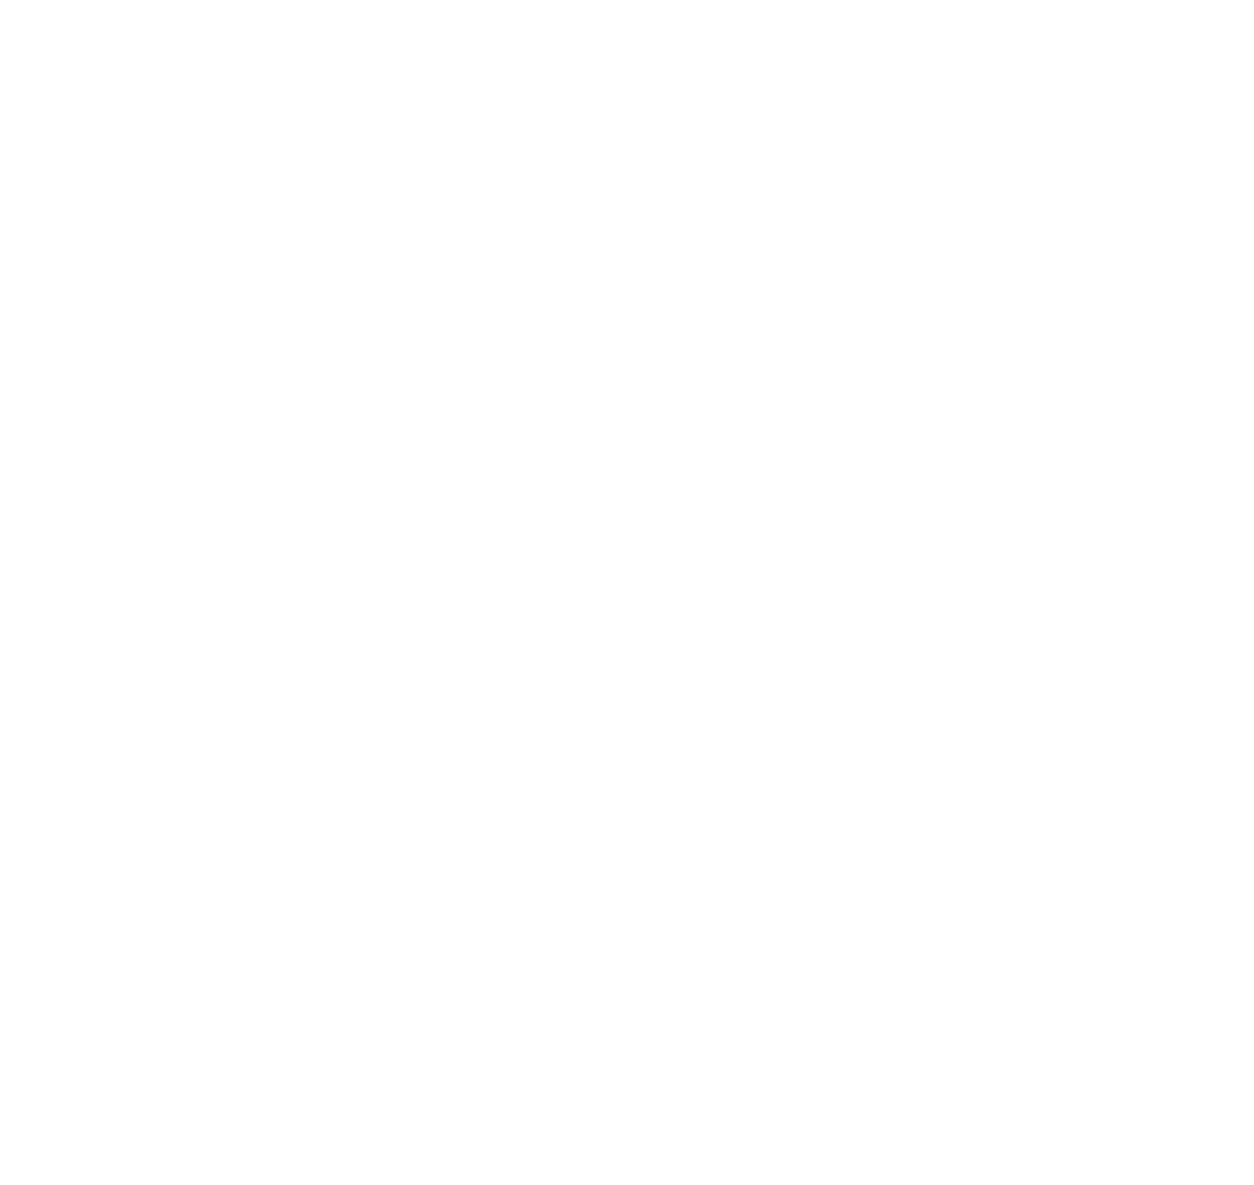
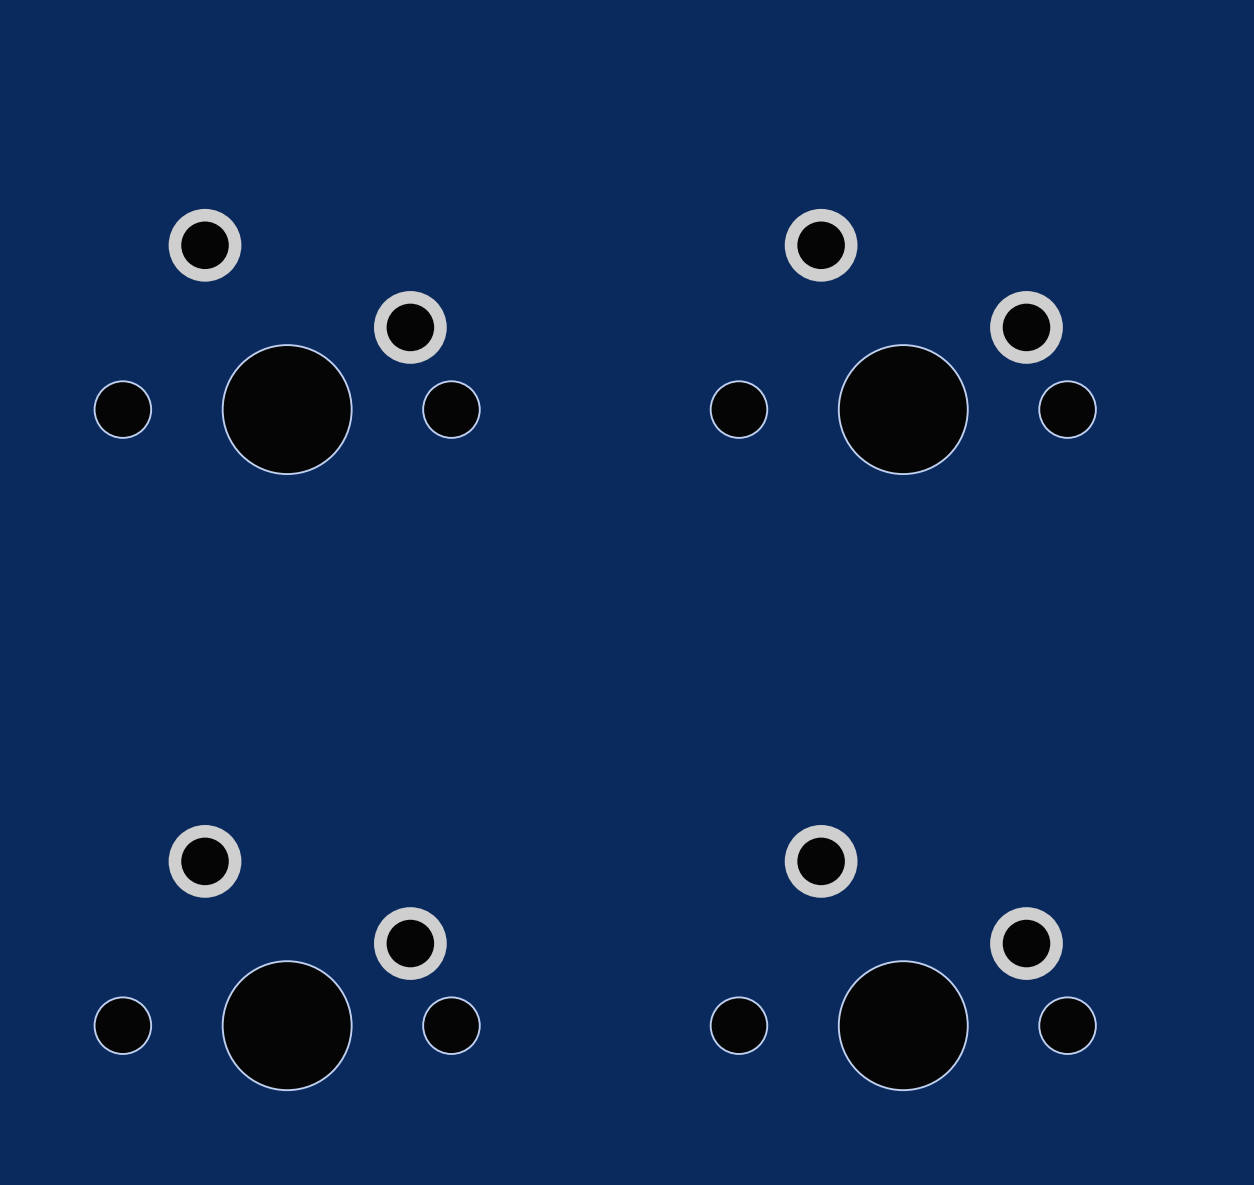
part: none -> (287, 341)
part: none -> (903, 341)
part: none -> (287, 957)
part: none -> (903, 957)

